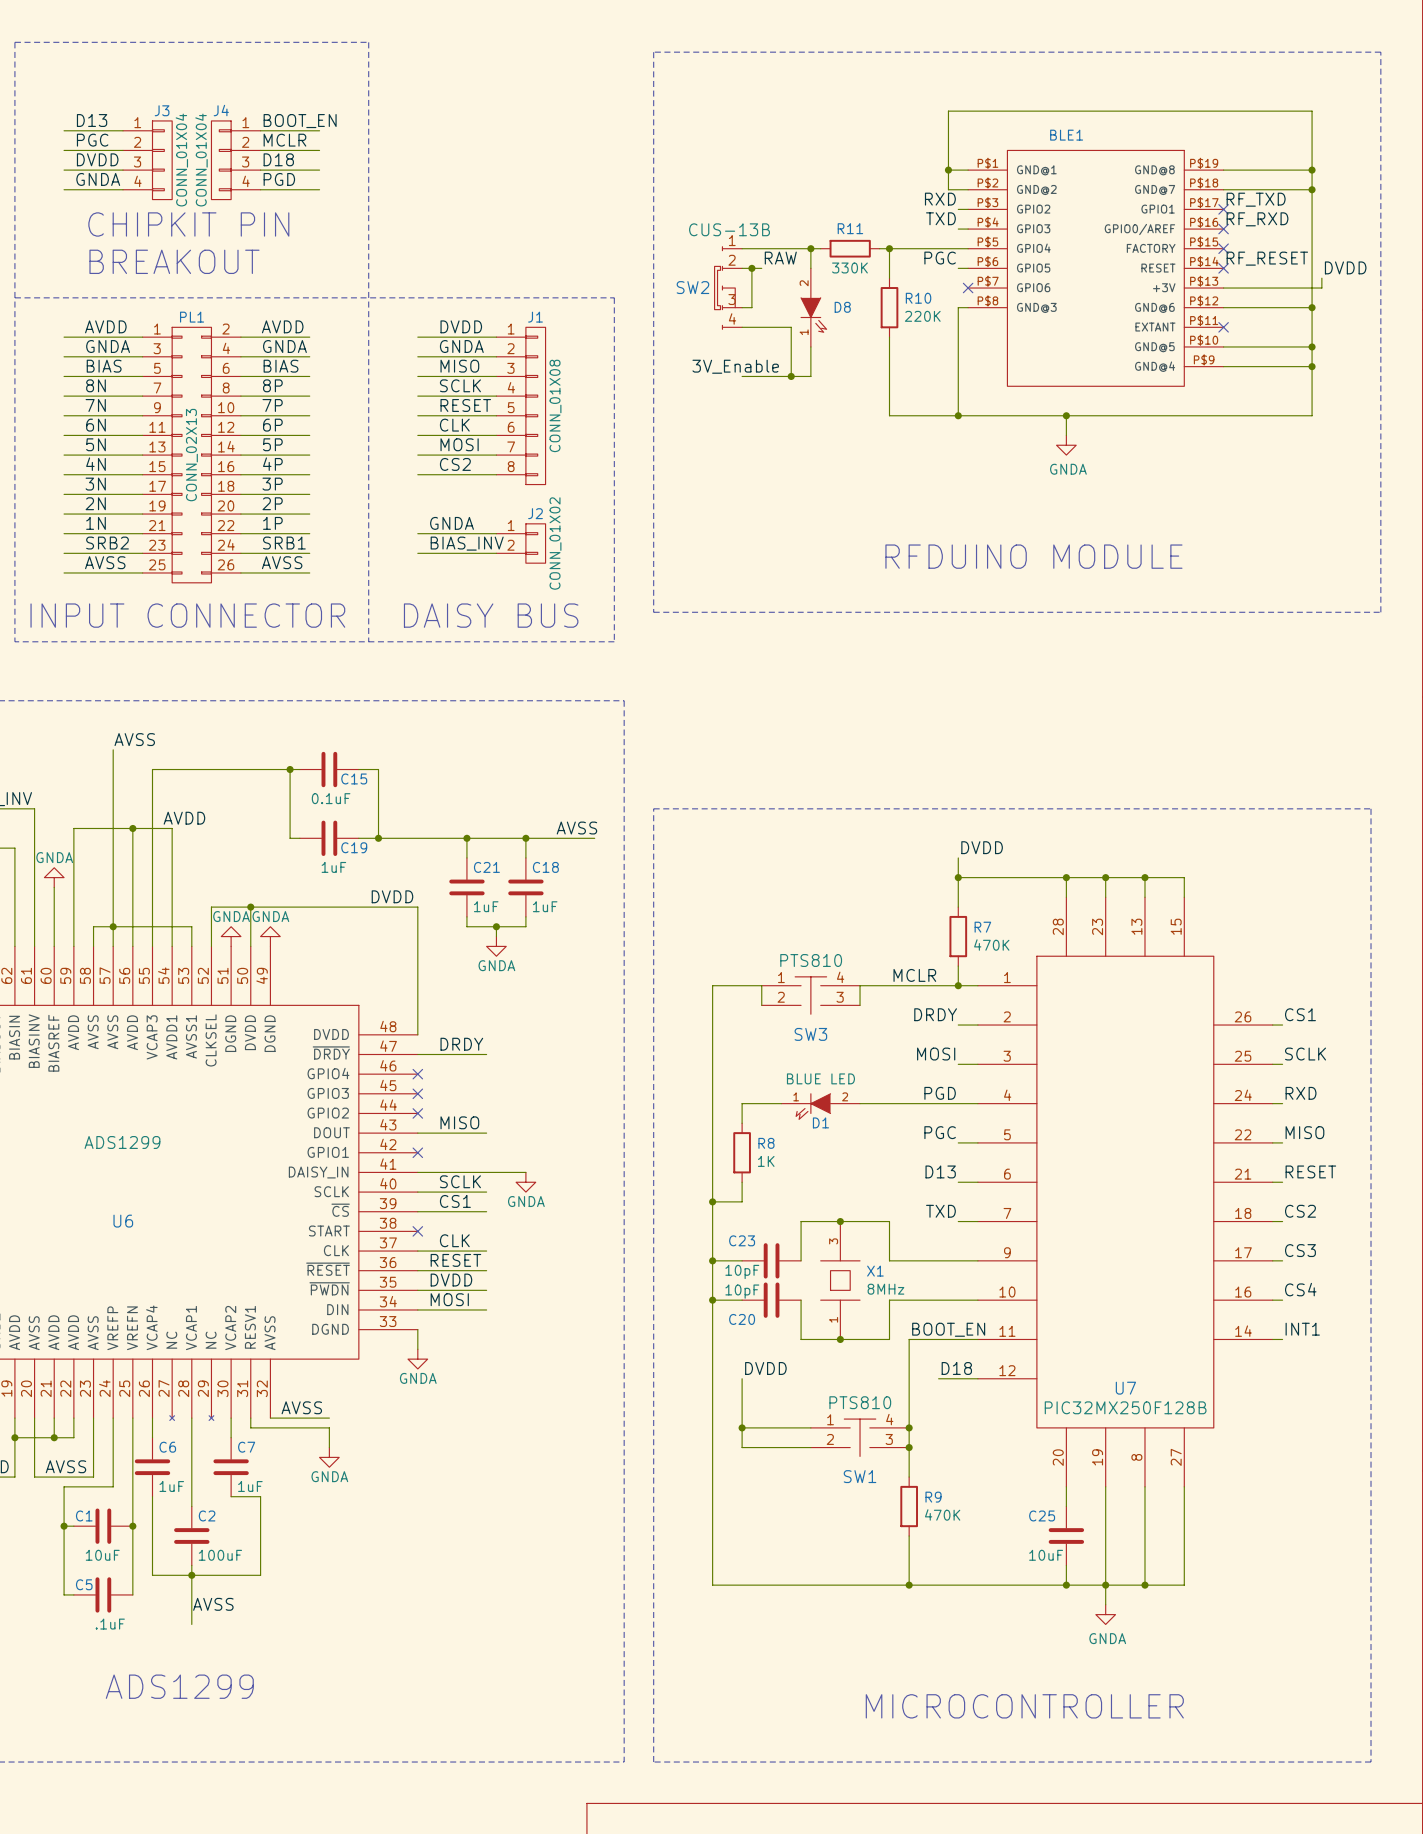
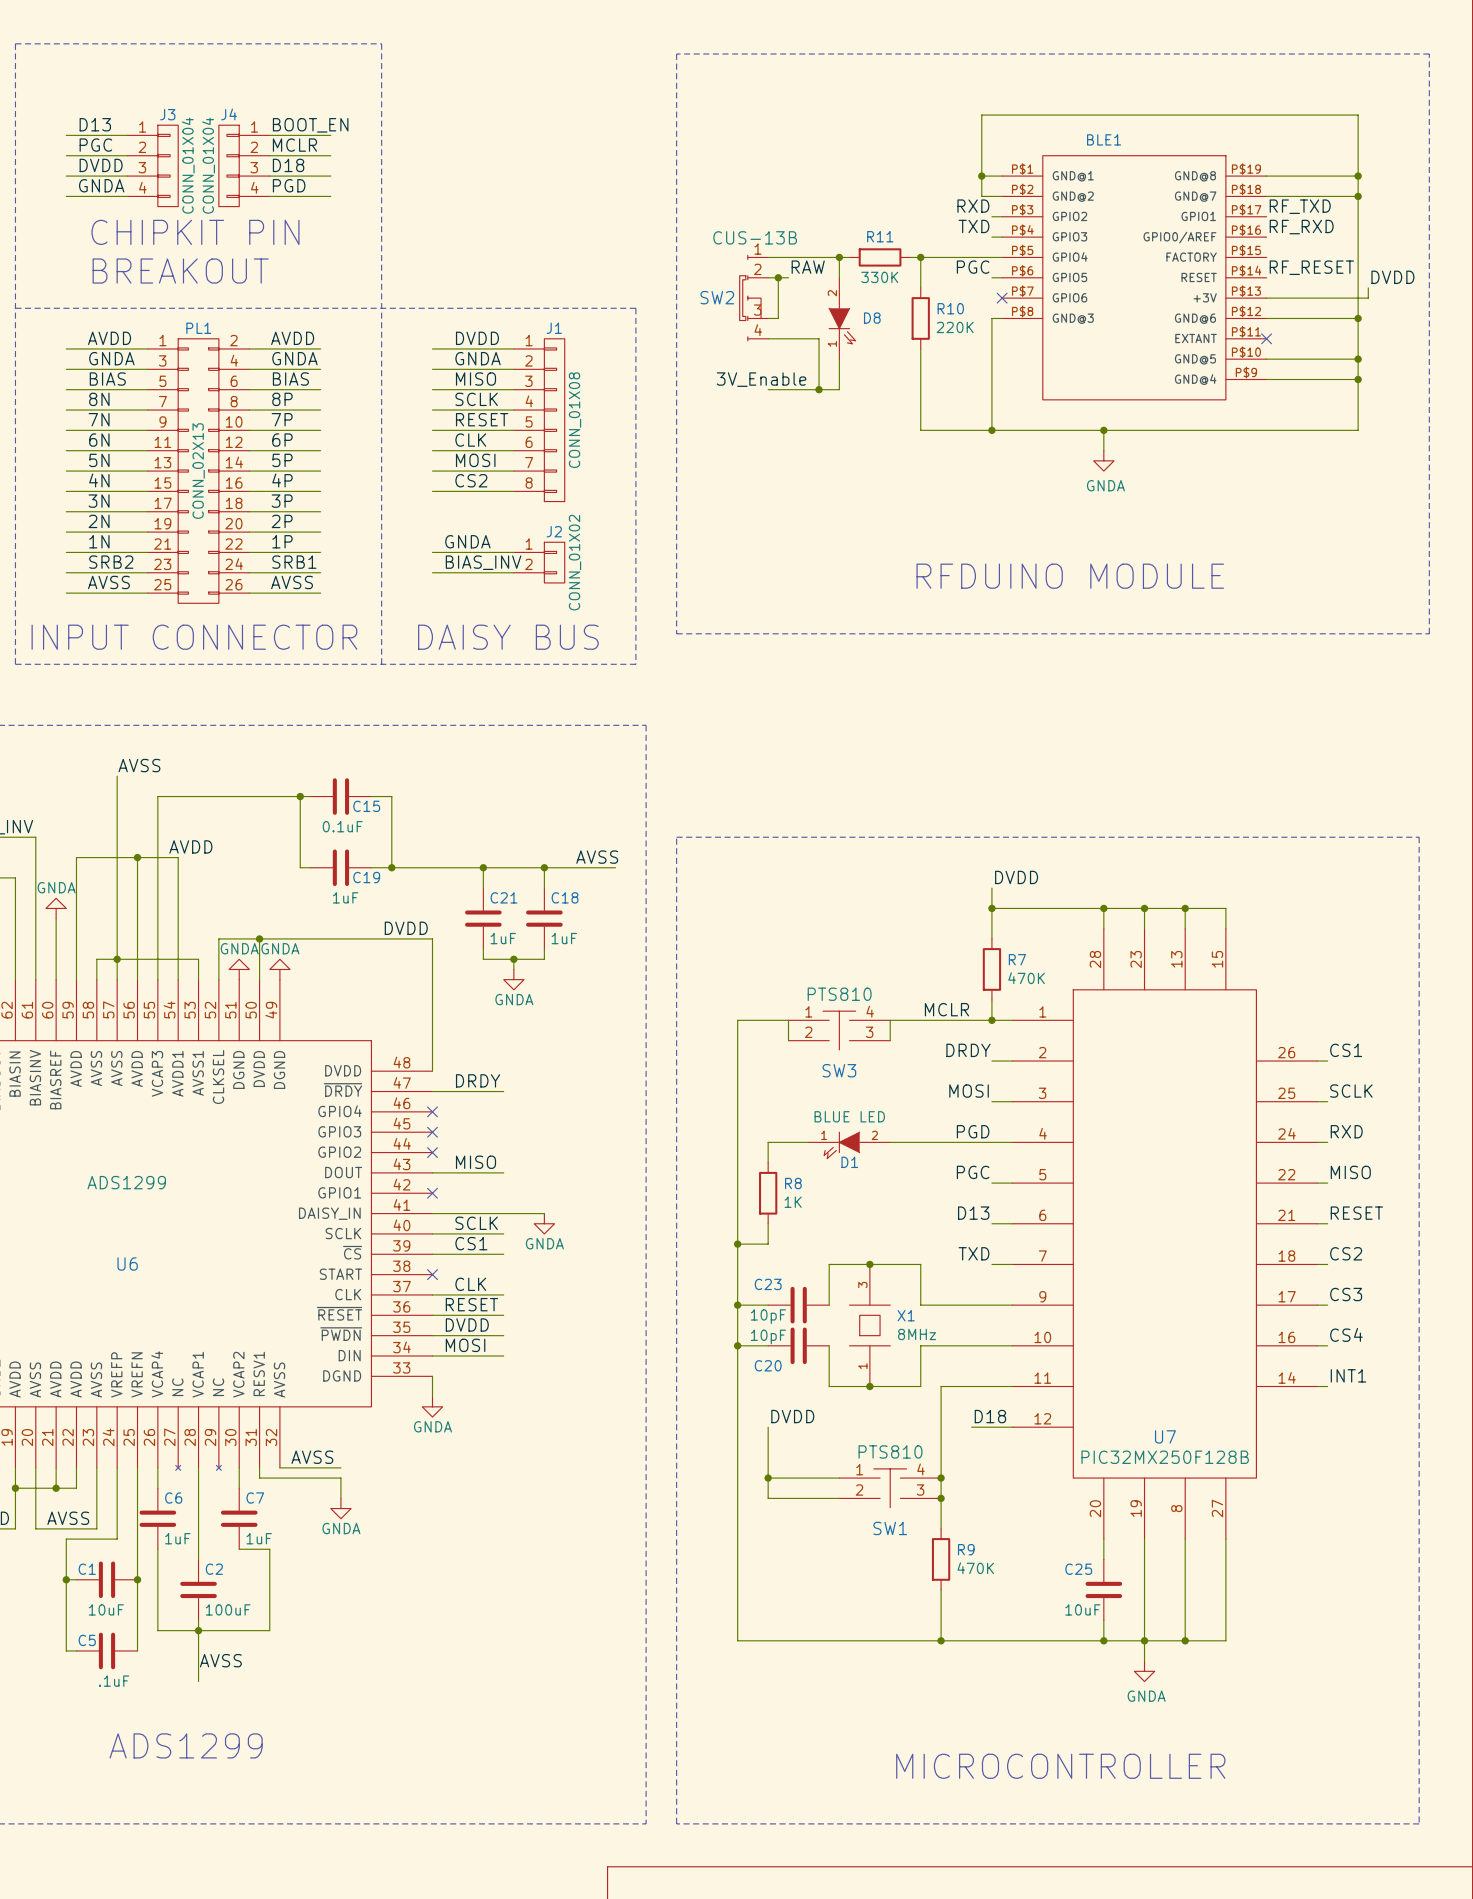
no-connect mark: (1223, 209) -> none
no-connect mark: (1223, 229) -> none
no-connect mark: (1223, 248) -> none
no-connect mark: (1223, 268) -> none
label: BOOT_EN (948, 1329) -> none

